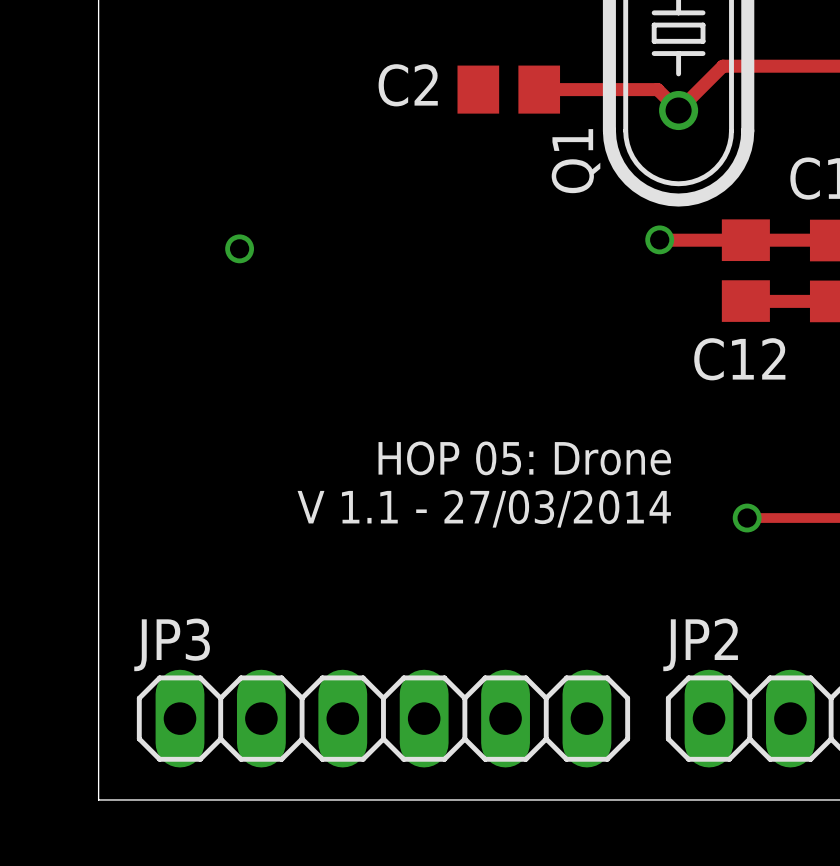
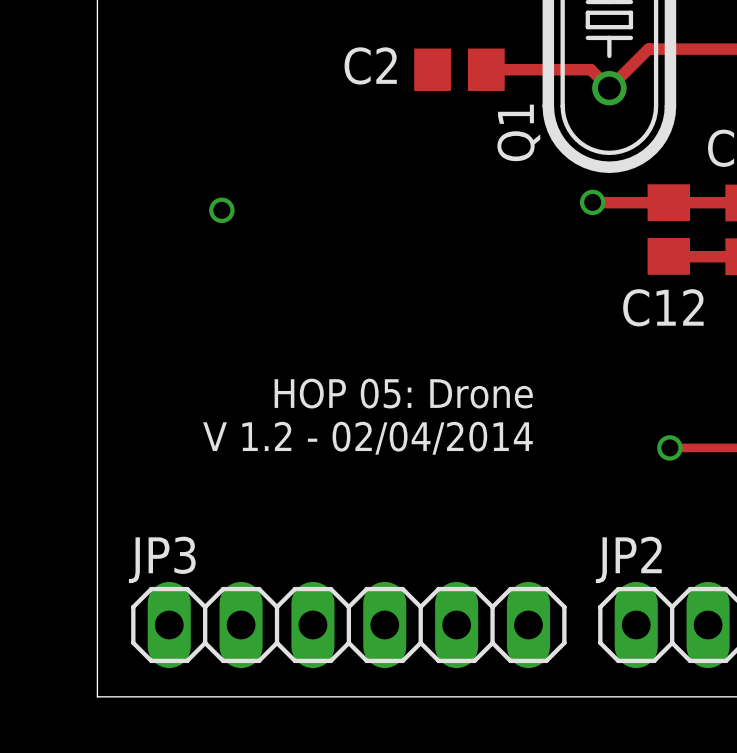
text position: HOP 05: Drone (524, 458) -> HOP 05: Drone (403, 393)
text: V 1.1 - 27/03/2014 (484, 508) -> V 1.2 - 02/04/2014 (367, 438)

